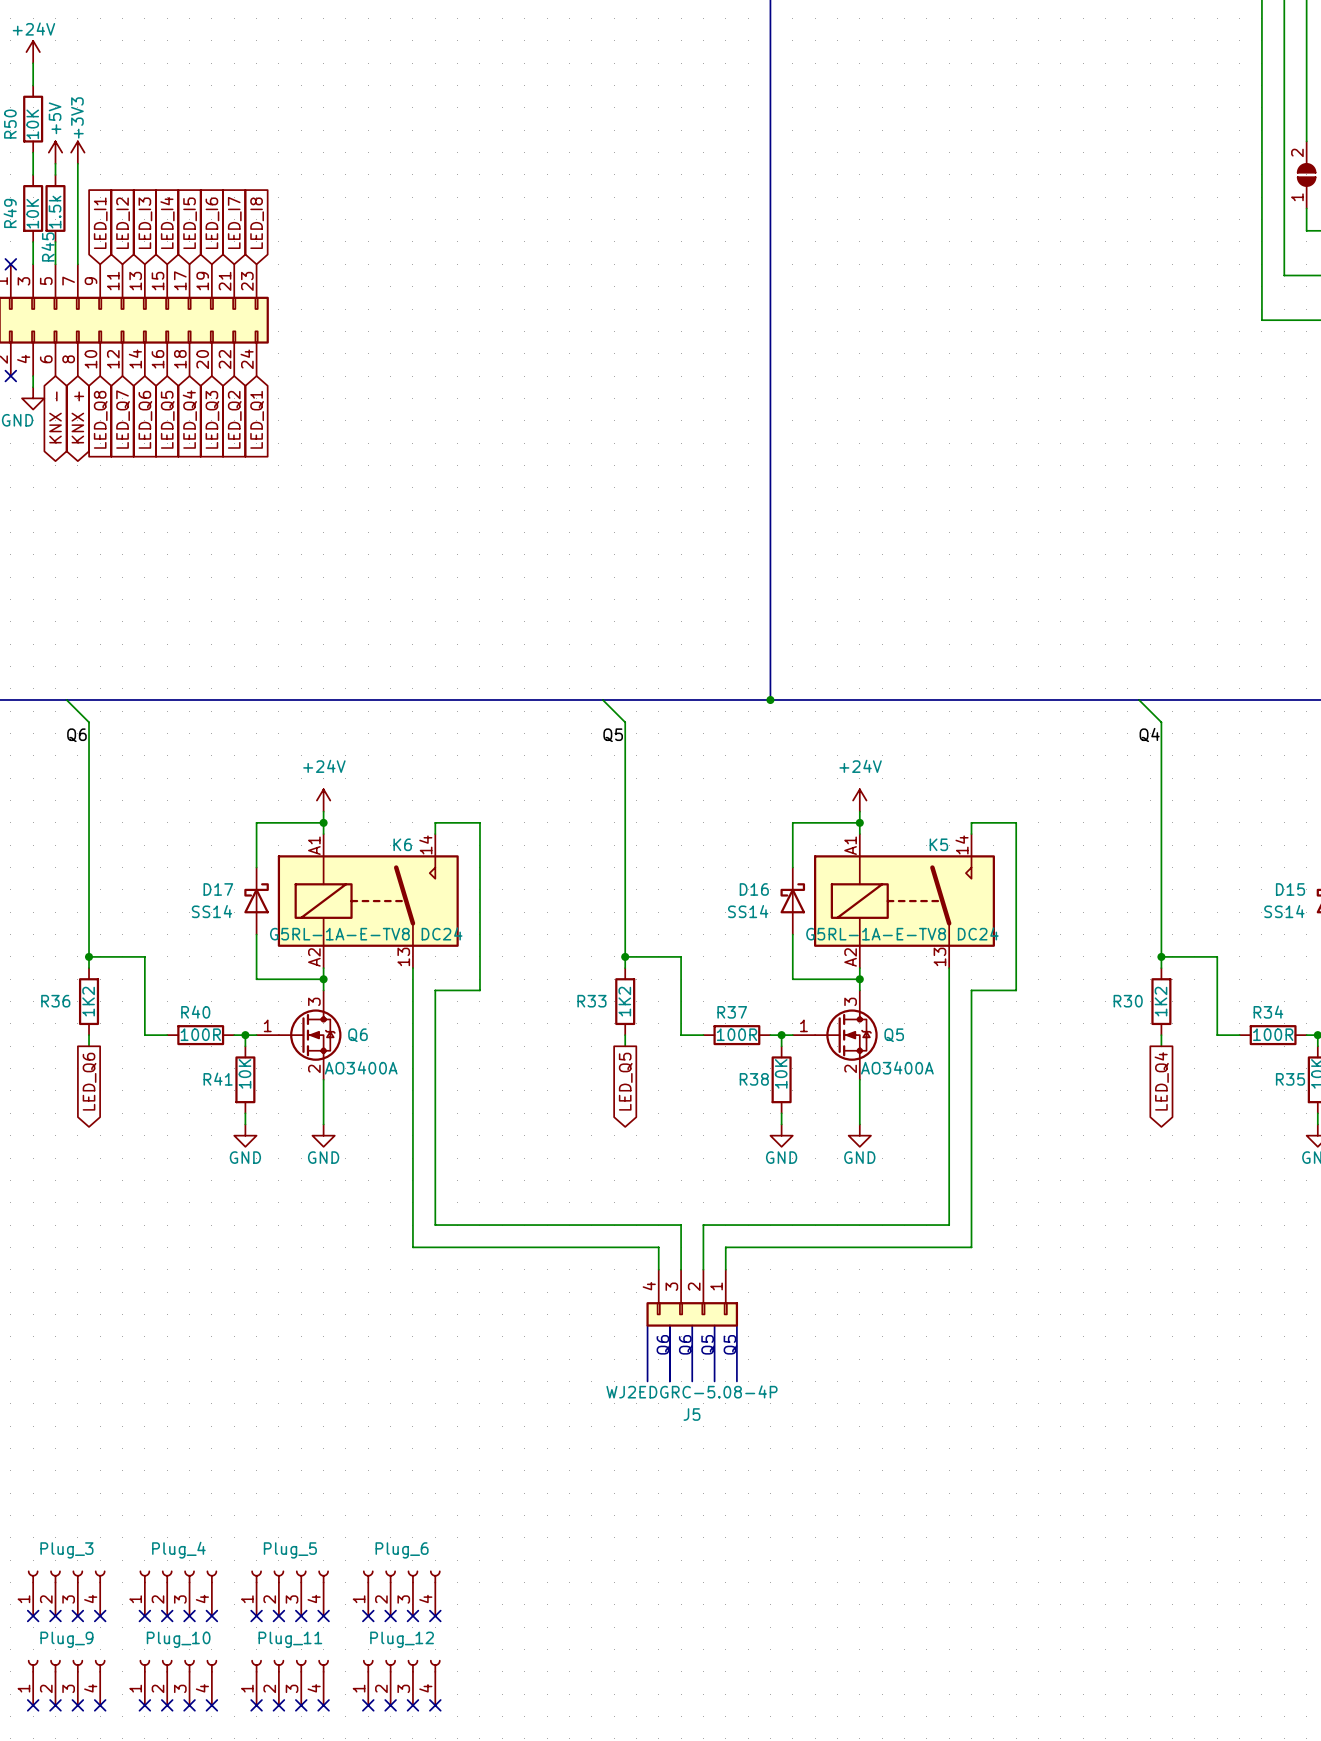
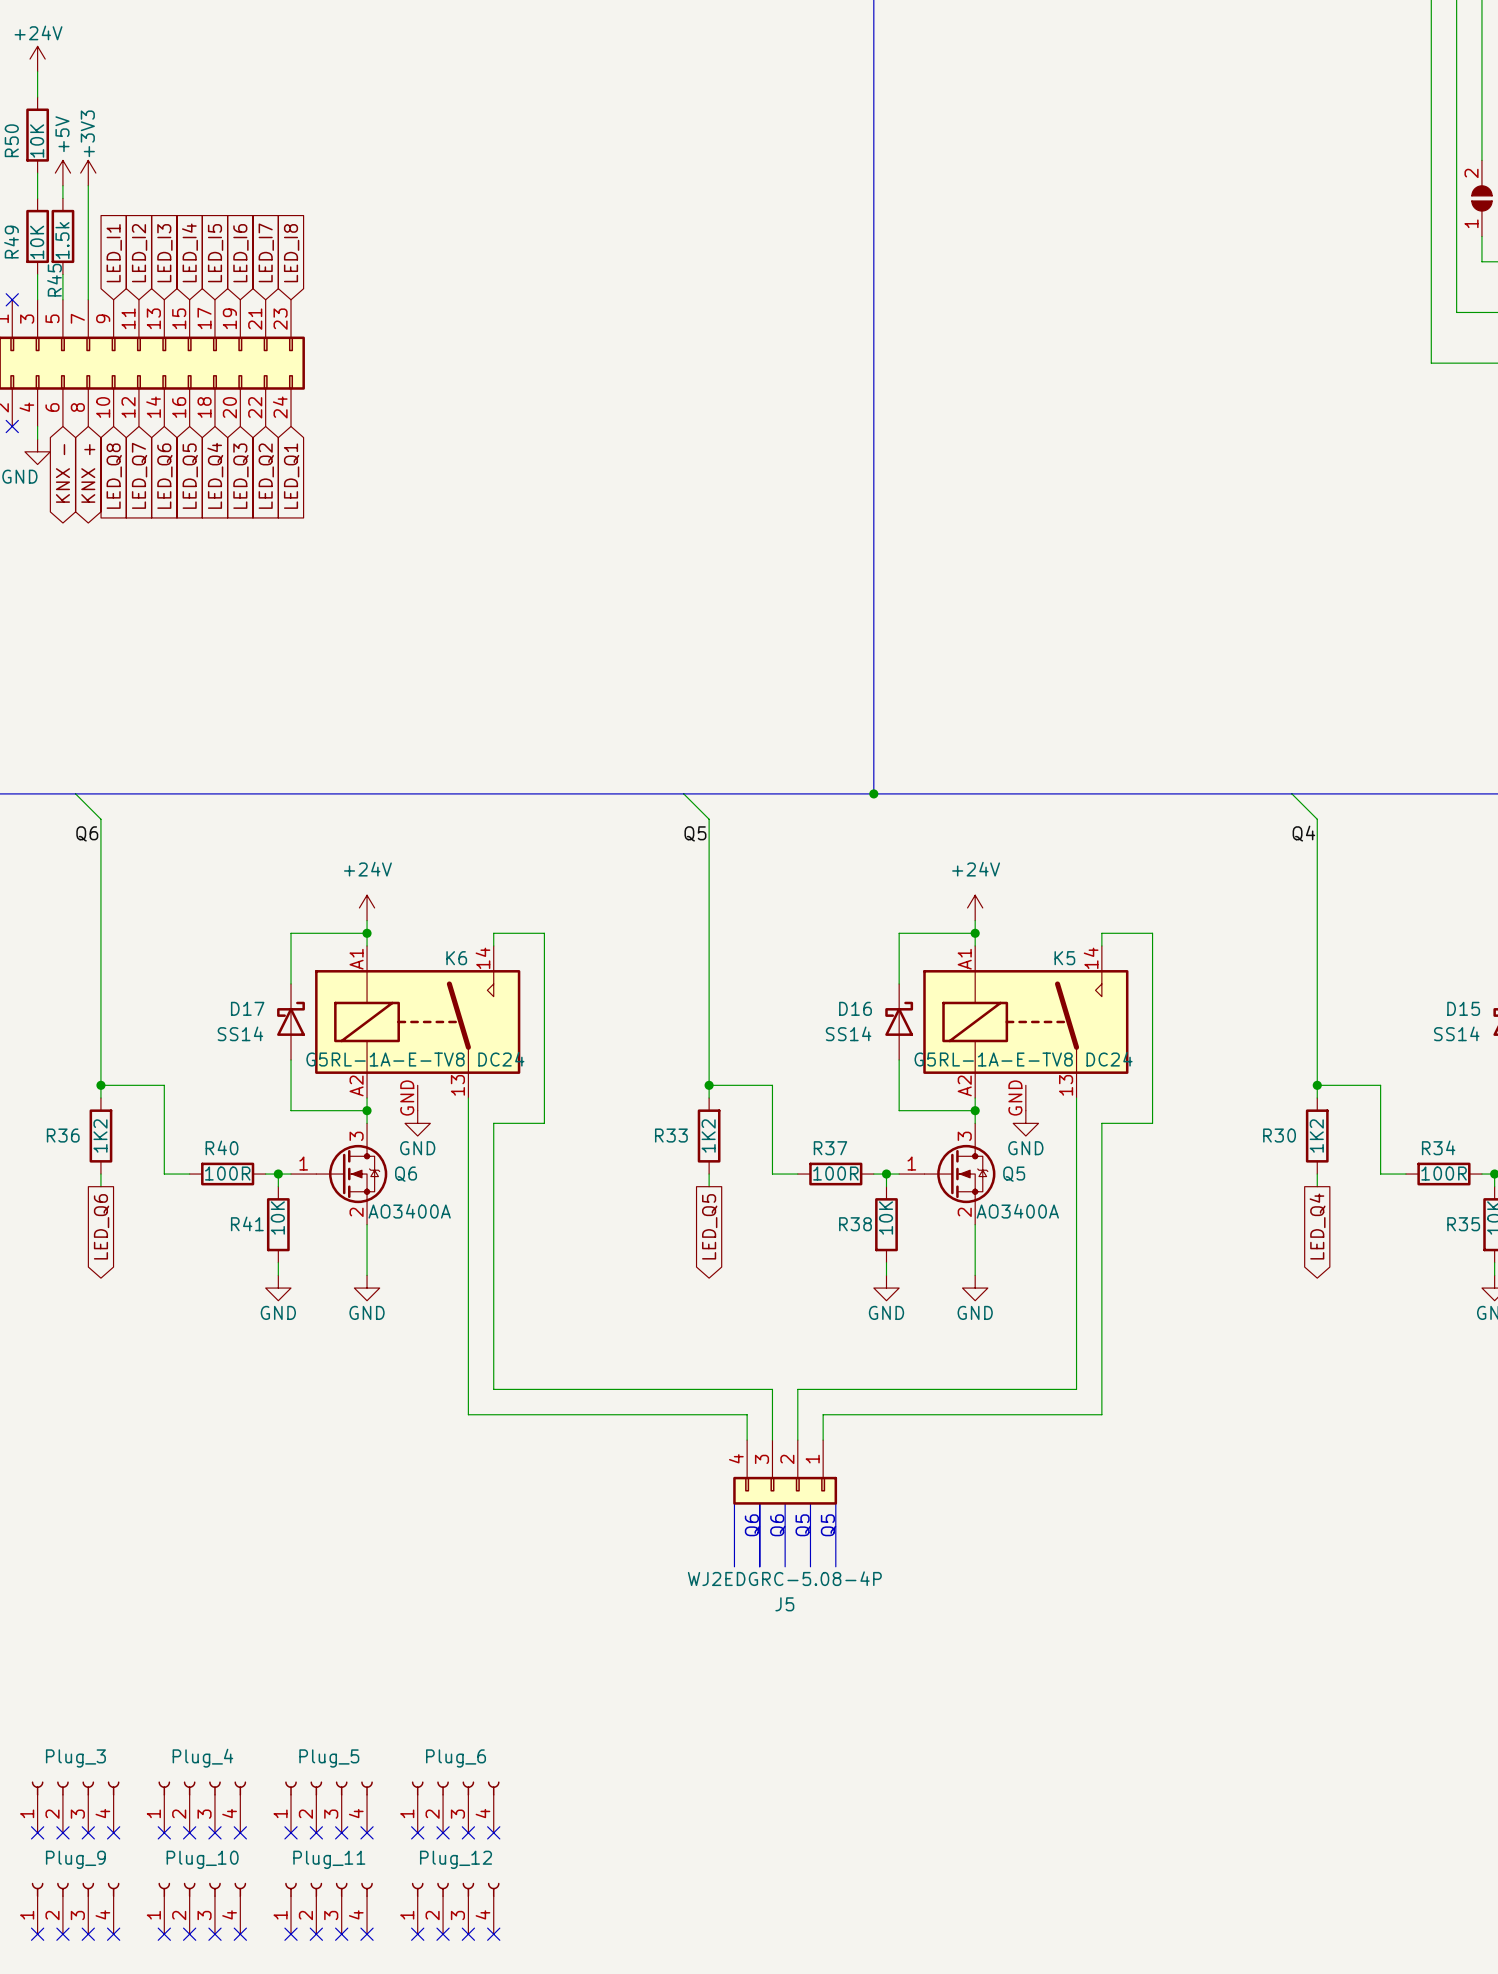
K6 symbol: [277, 834, 459, 969] -> [315, 945, 521, 1111]
K5 symbol: [814, 834, 995, 969] -> [923, 945, 1129, 1111]
power symbol: none -> GND (417, 1123)
power symbol: none -> GND (1025, 1123)

